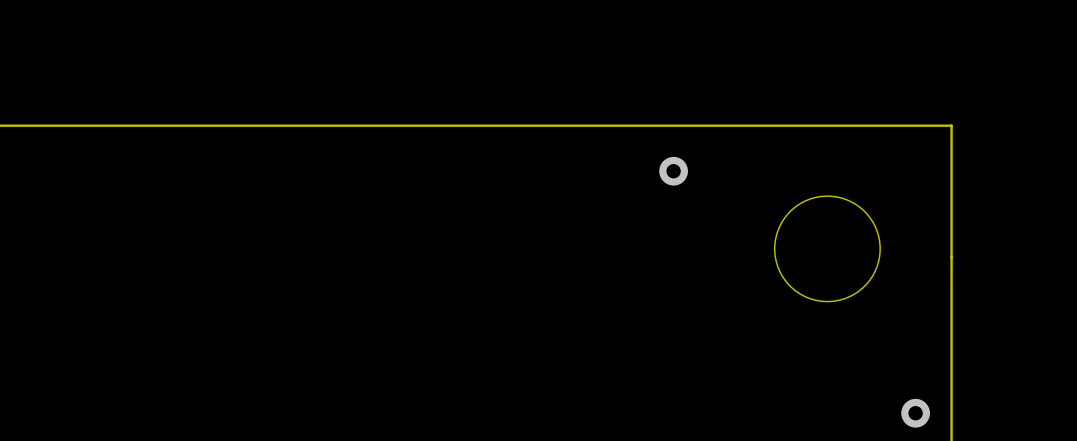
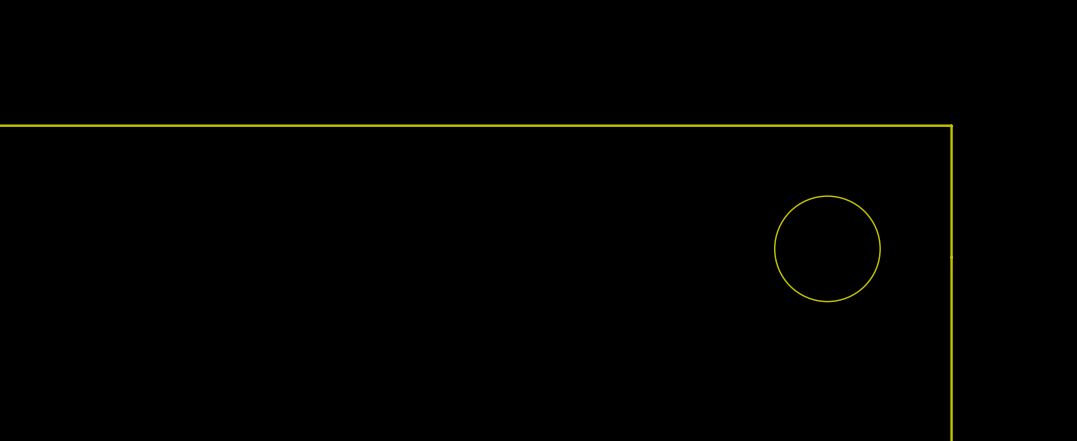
via: (673, 171) -> none
via: (915, 413) -> none

